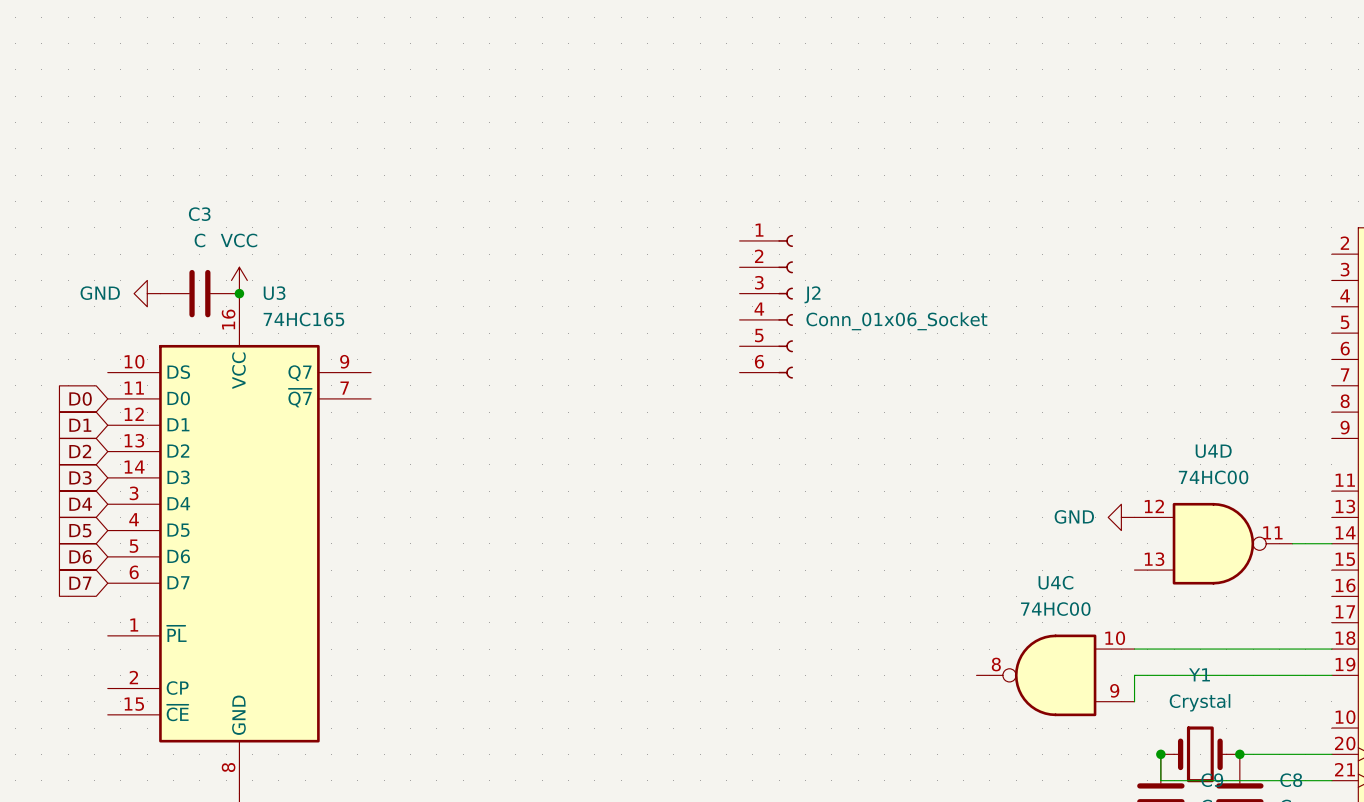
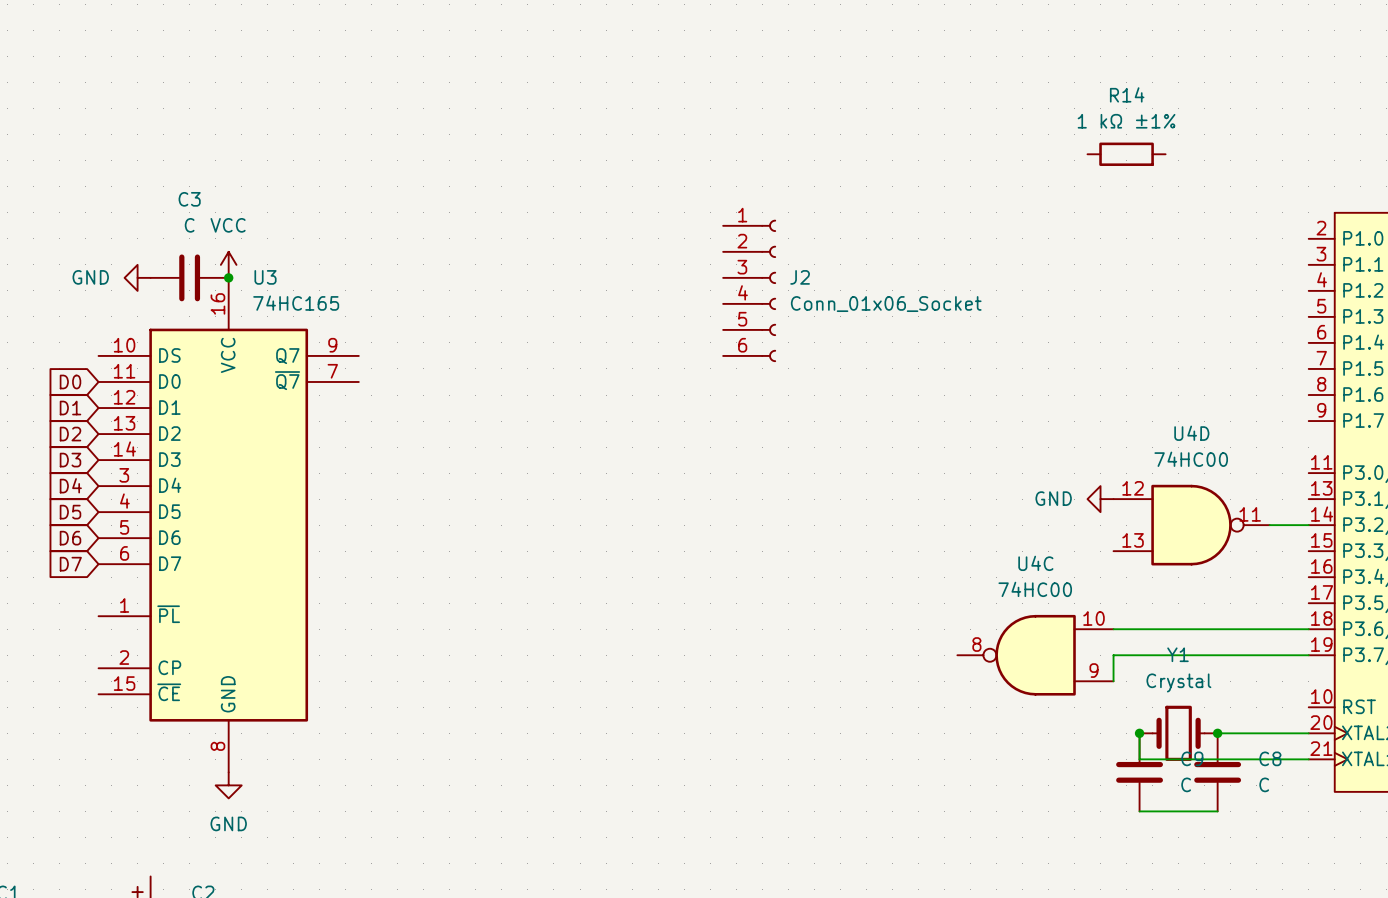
R14: none -> 1 kΩ ±1% (1126, 154)

